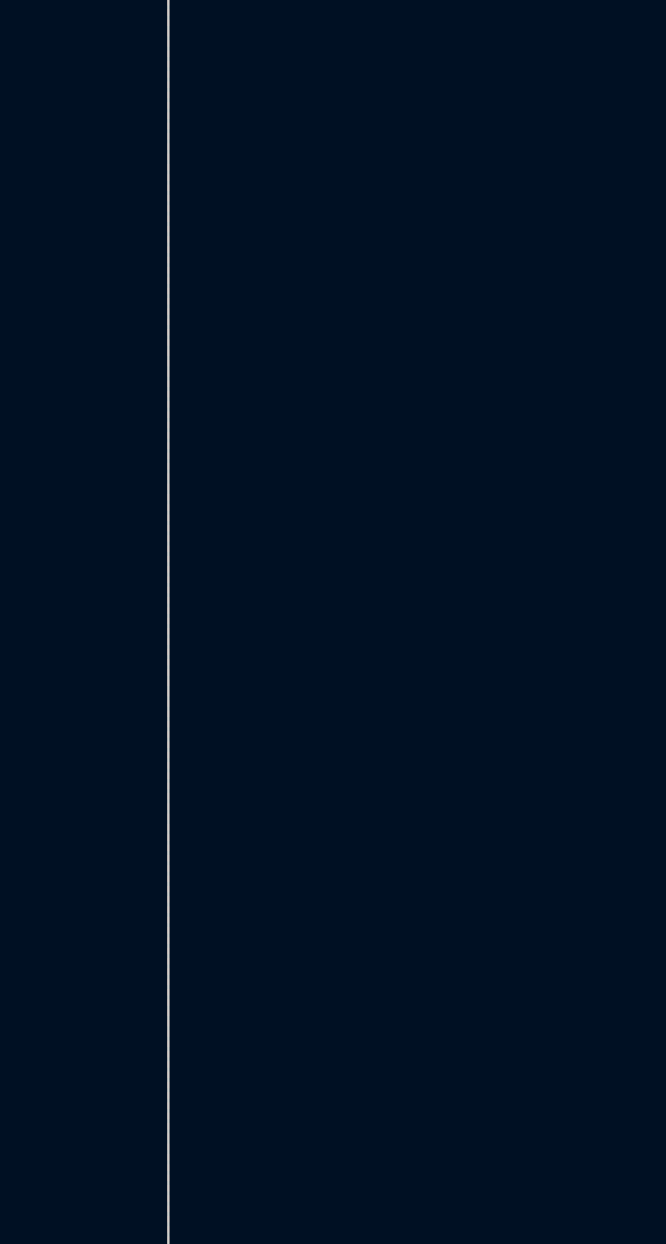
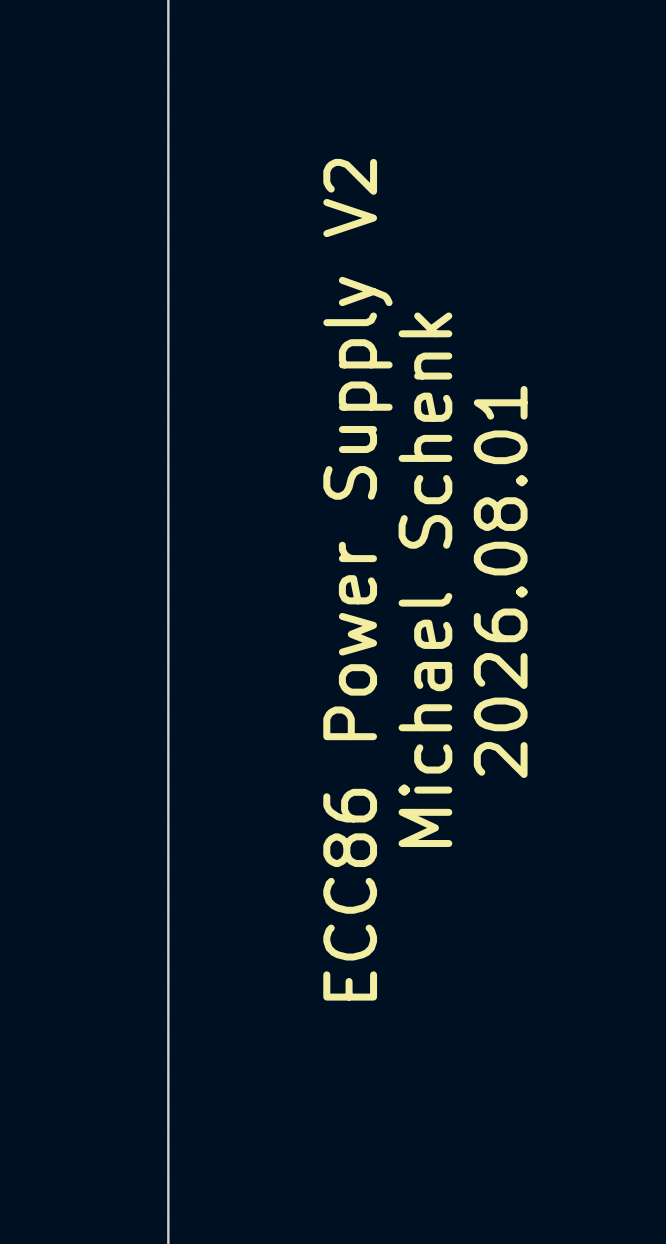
text: none -> ECC86 Power Supply V2 (357, 579)
text: none -> Michael Schenk (425, 579)
text: none -> 2026.08.01 (500, 581)

